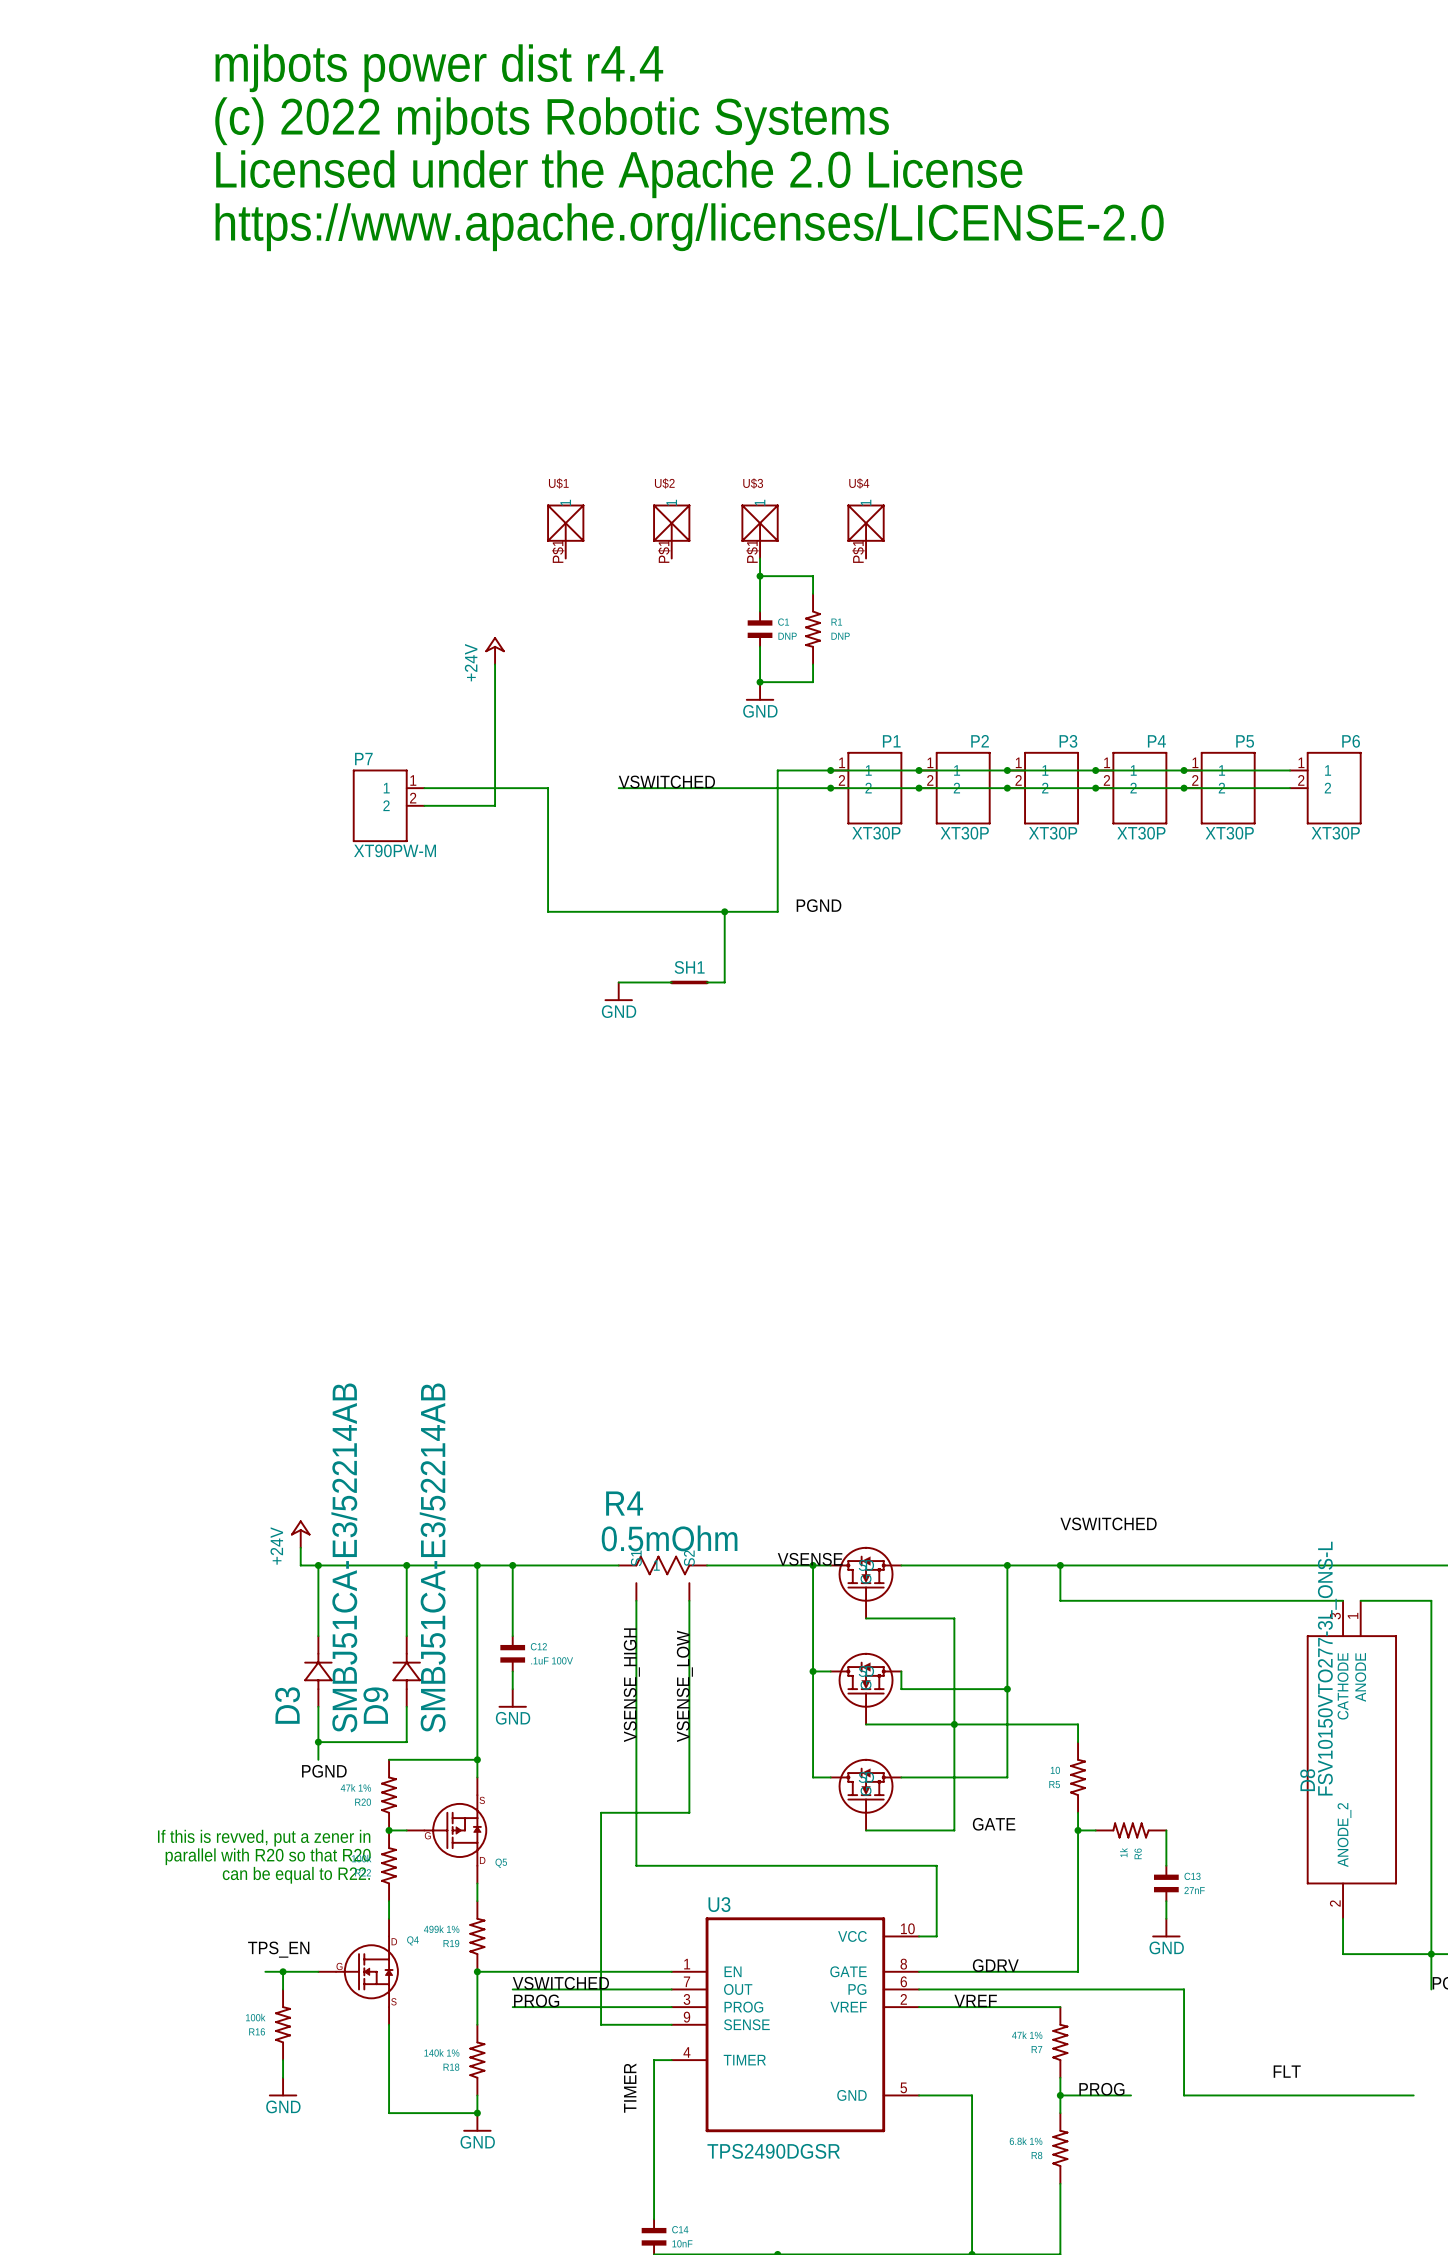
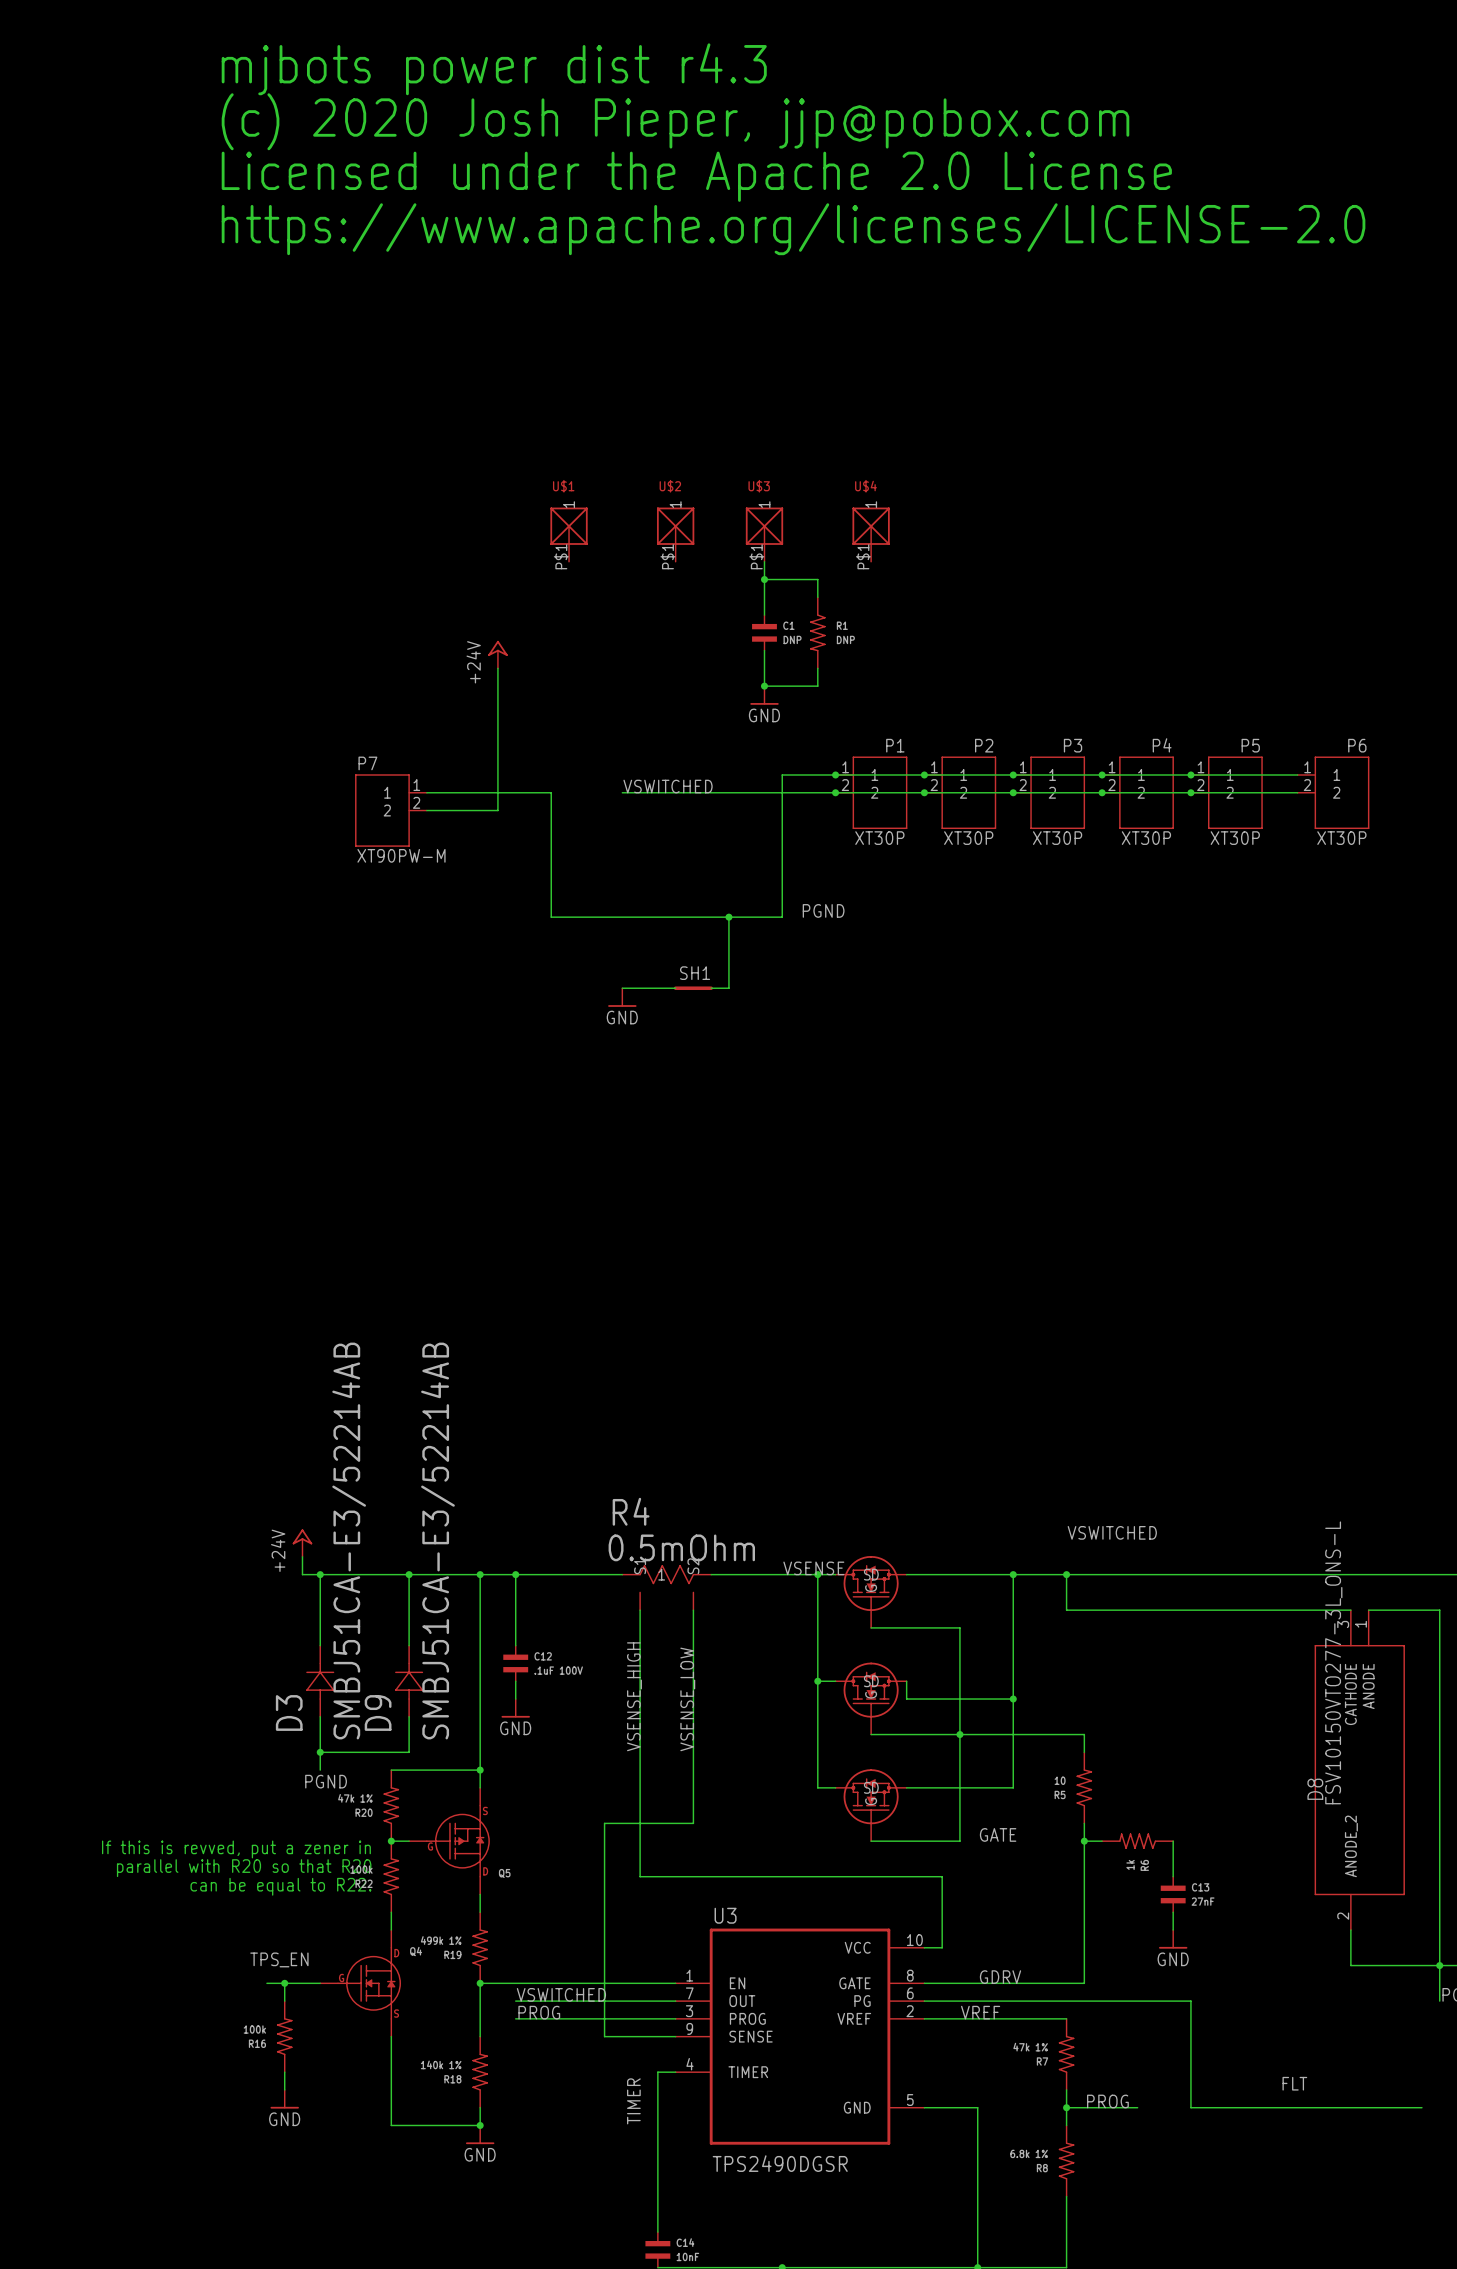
text: mjbots power dist r4.4 (439, 68) -> mjbots power dist r4.3 (494, 69)
text: (c) 2022 mjbots Robotic Systems (552, 121) -> (c) 2020 Josh Pieper, jjp@pobox.com (675, 121)

